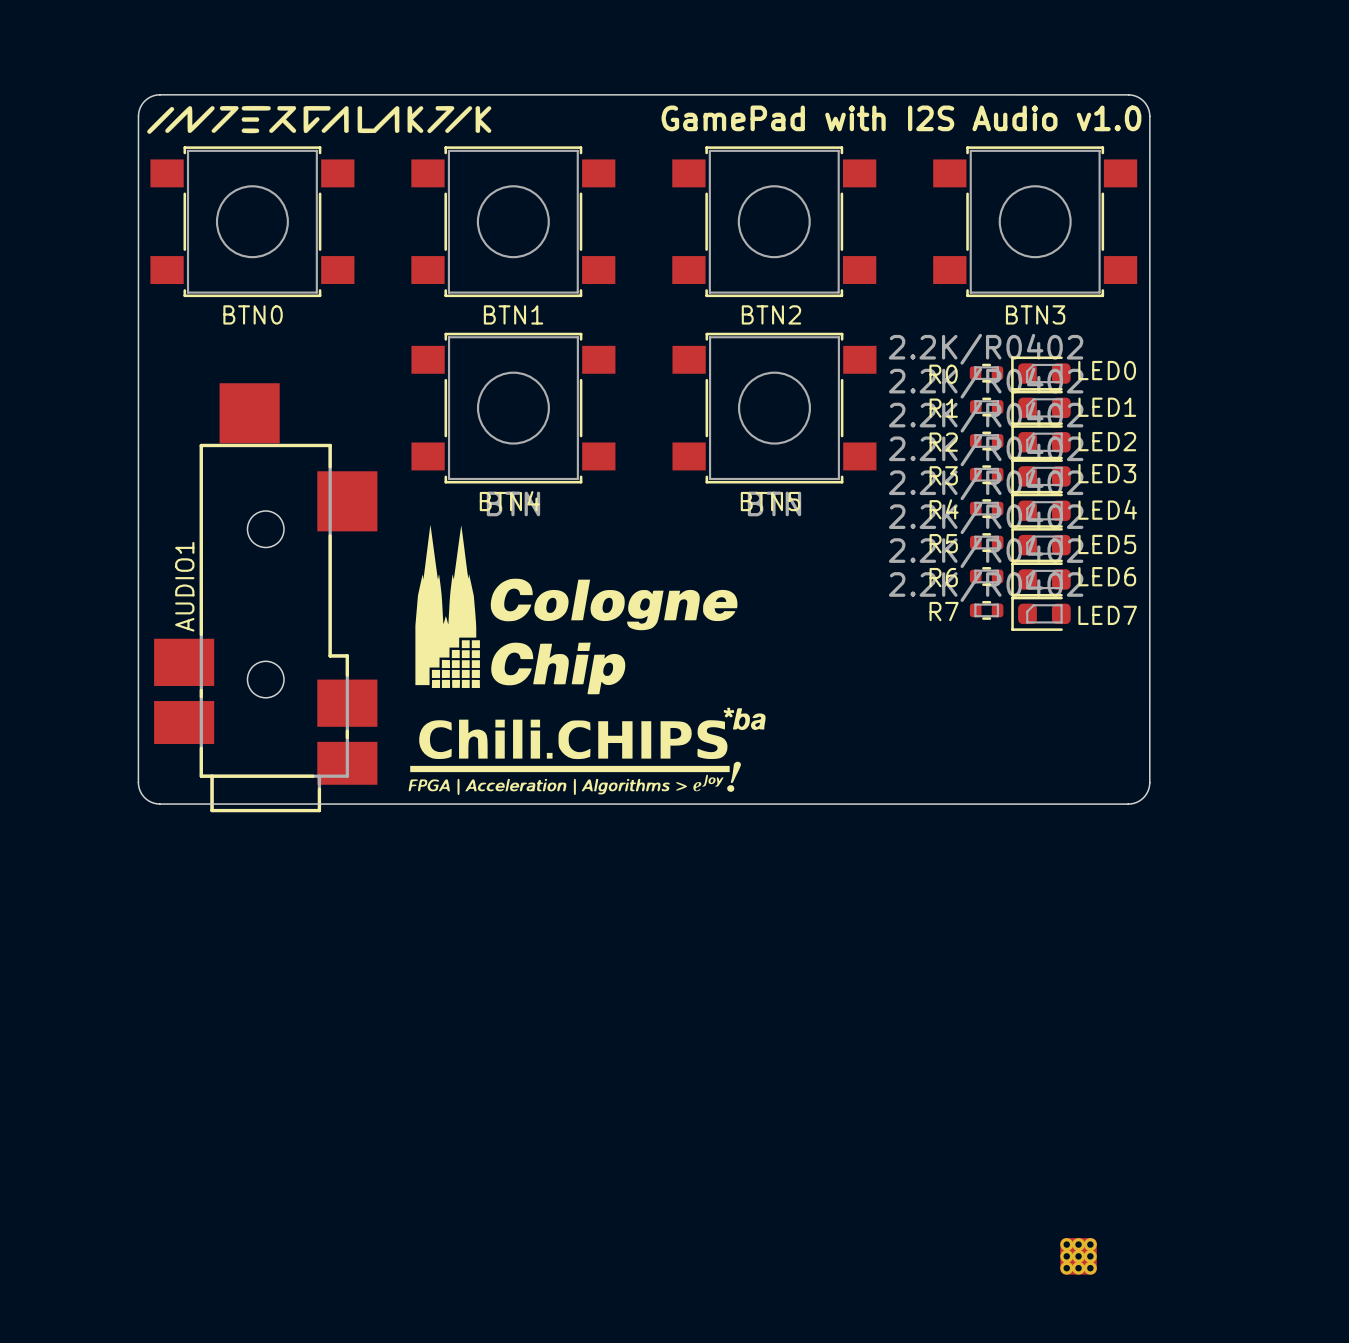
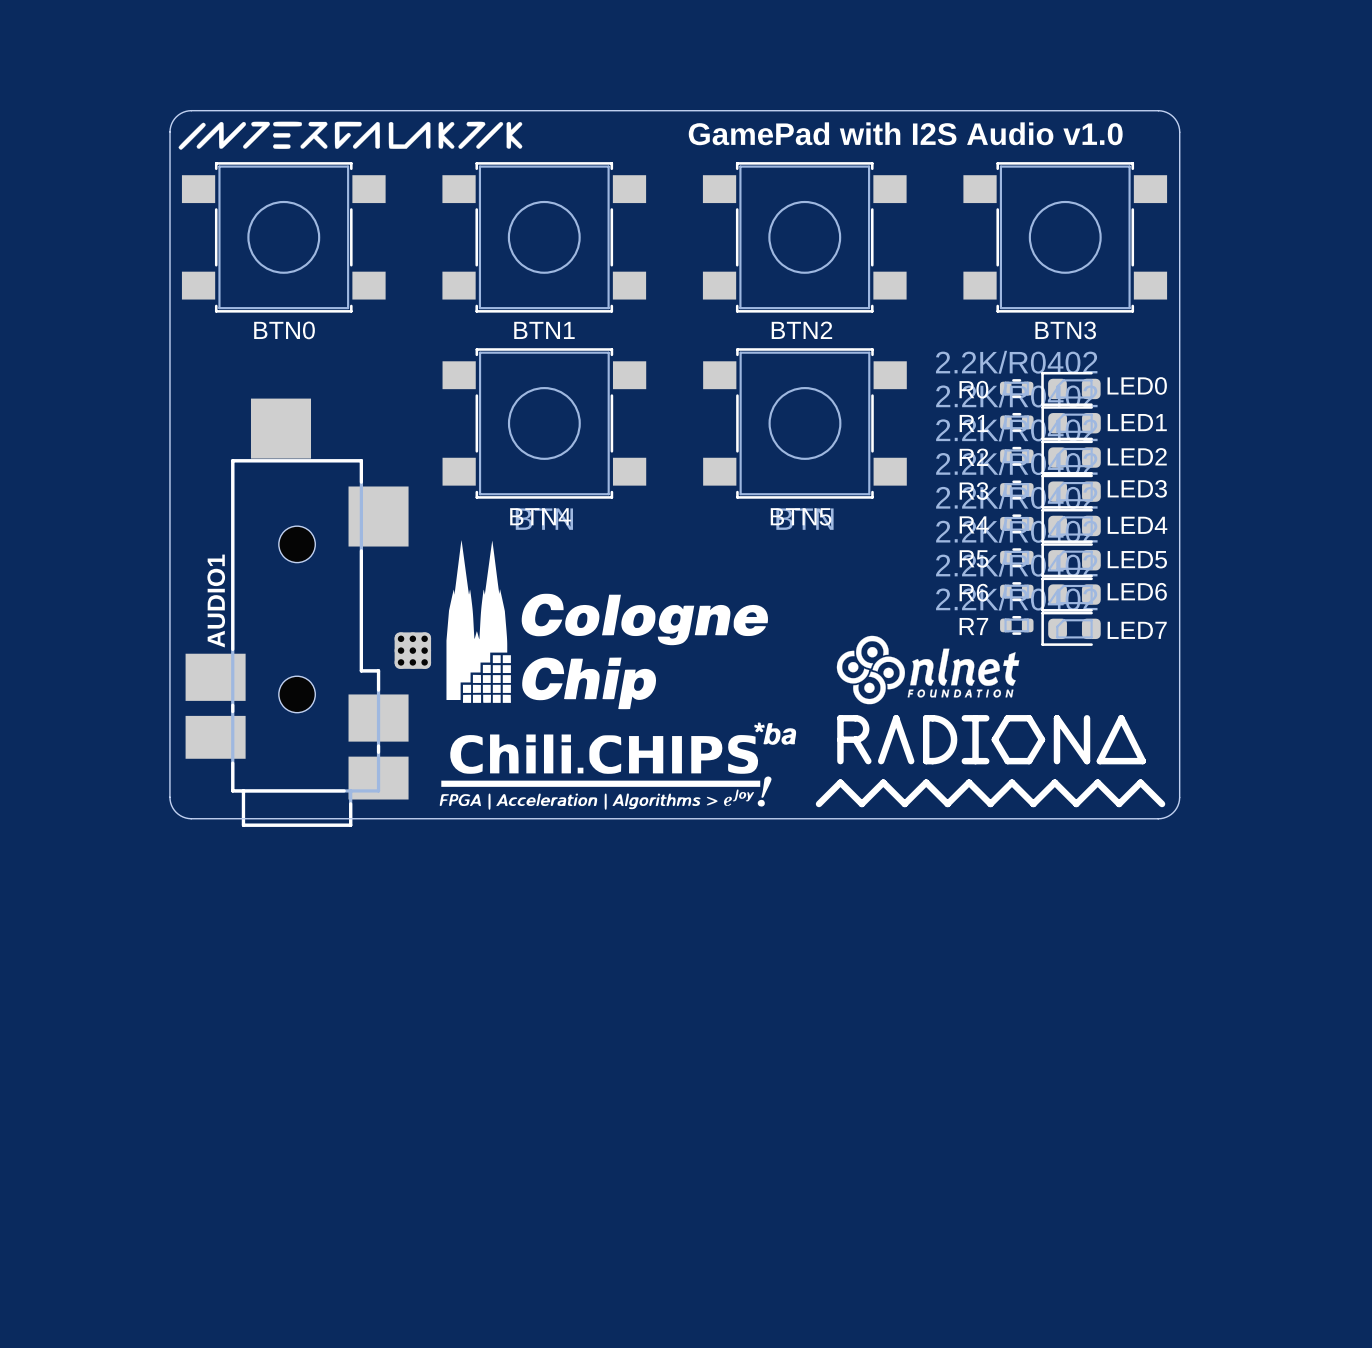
drawing: none -> [815, 635, 1166, 808]
part: none -> (412, 650)
part: (1078, 1256) -> none

